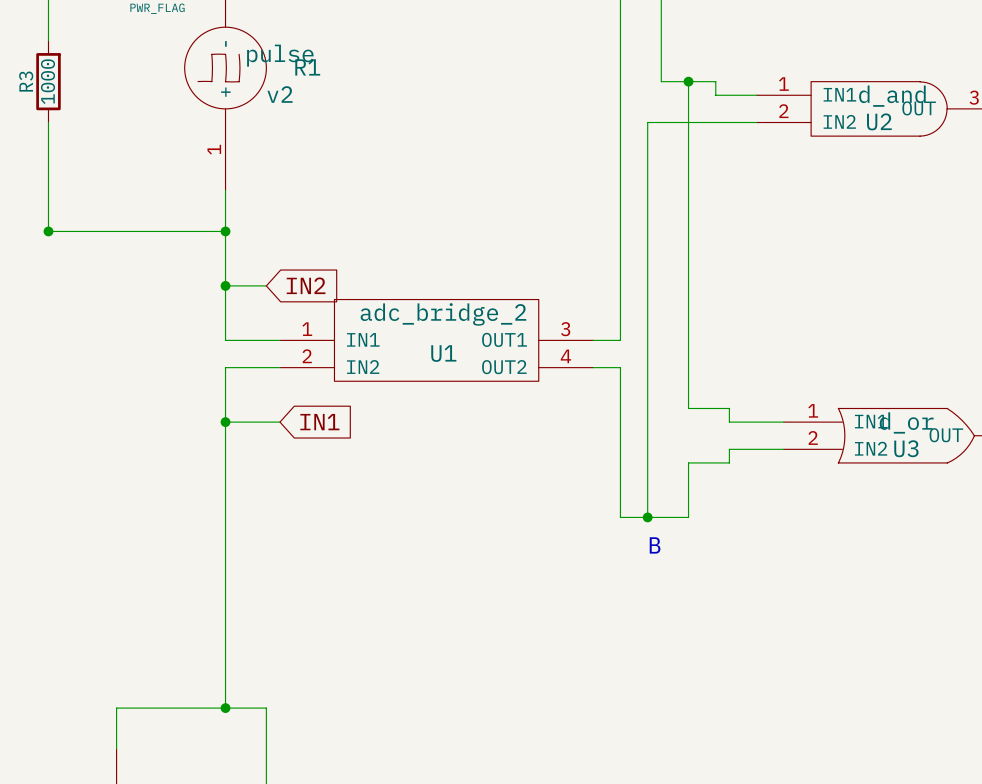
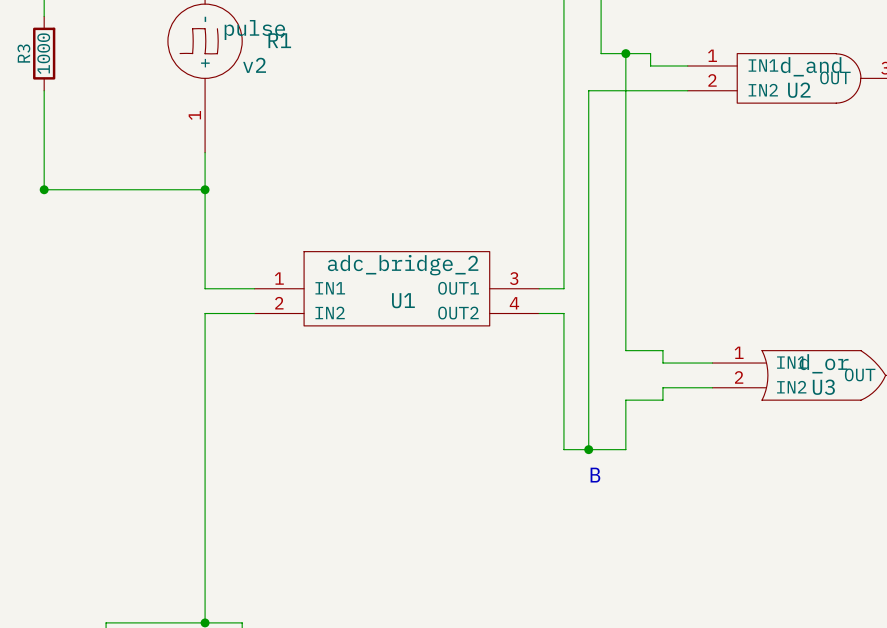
wire: (225, 285) (266, 285) -> none
junction: (225, 285) -> none
global label: IN2 (306, 285) -> none
wire: (225, 422) (280, 422) -> none
junction: (225, 422) -> none
global label: IN1 (319, 422) -> none

